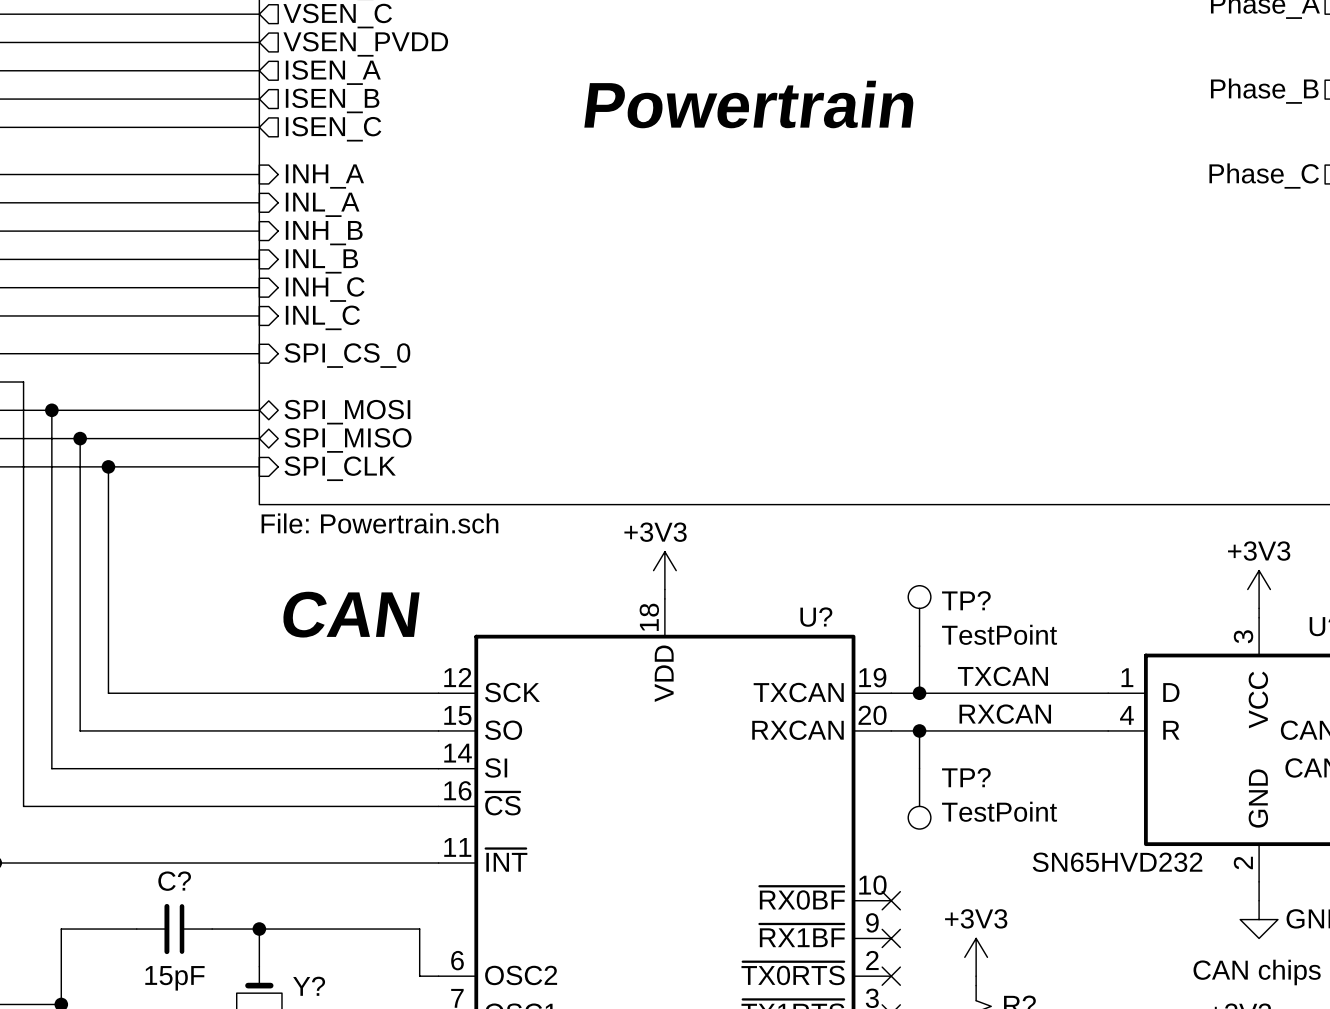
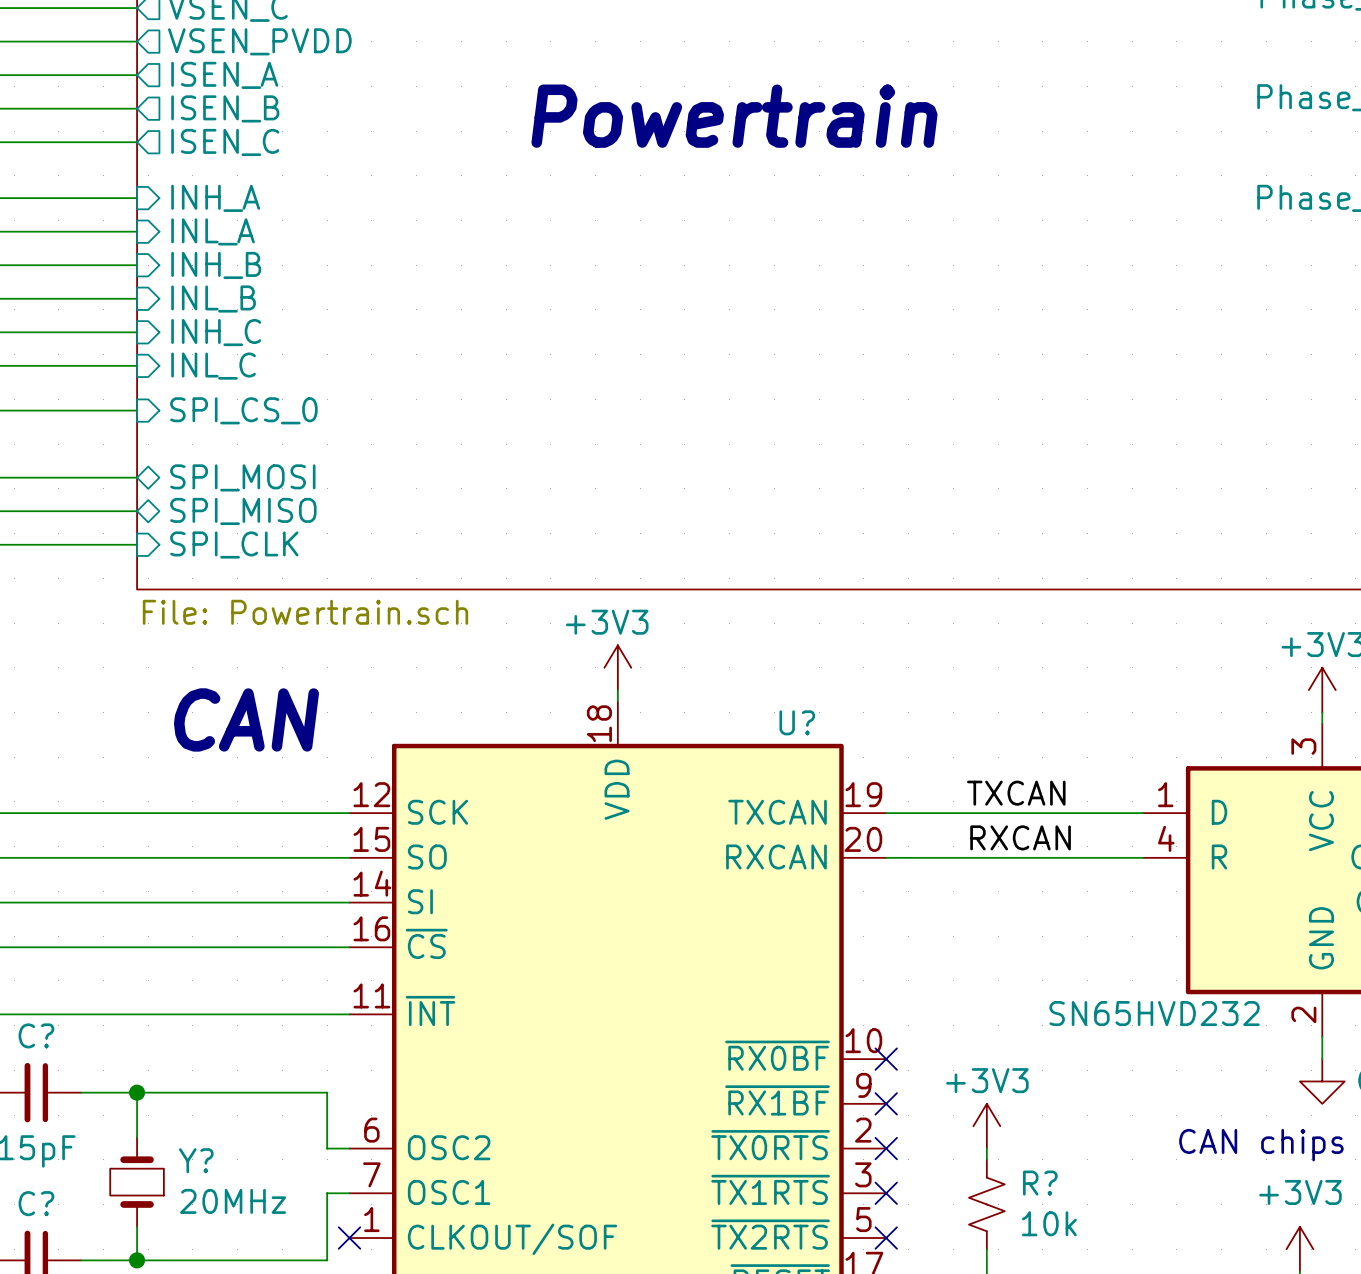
TP?: TestPoint (919, 615) -> none
wire: (919, 646) (919, 693) -> none
junction: (919, 693) -> none
wire: (919, 730) (919, 768) -> none
junction: (919, 730) -> none
TP?: TestPoint (919, 798) -> none

